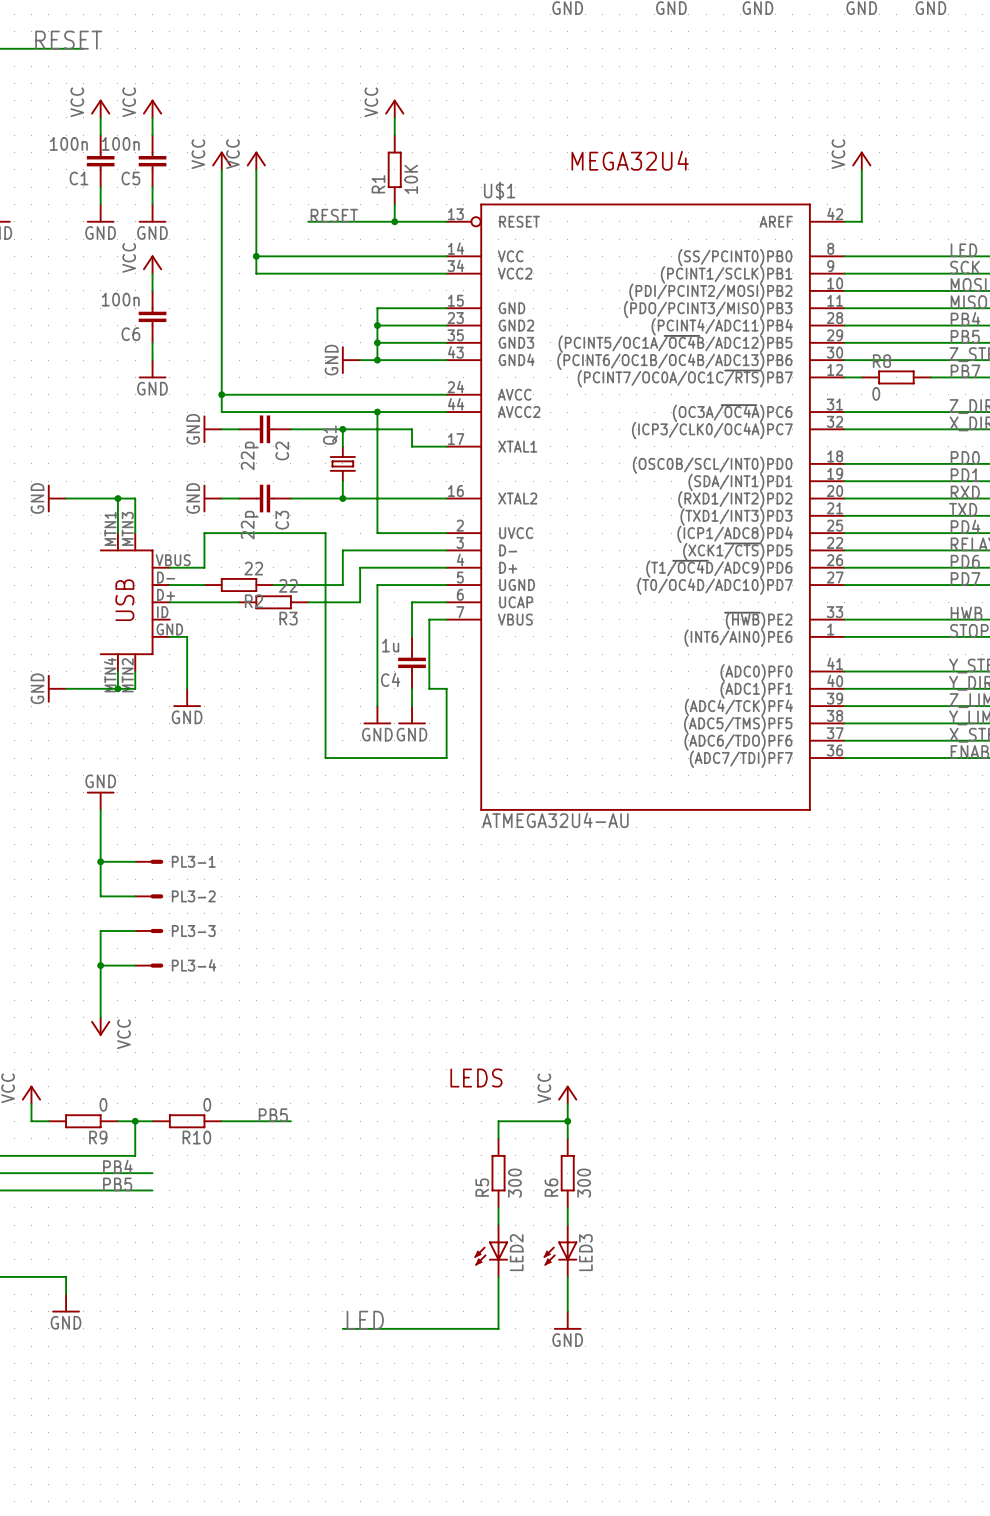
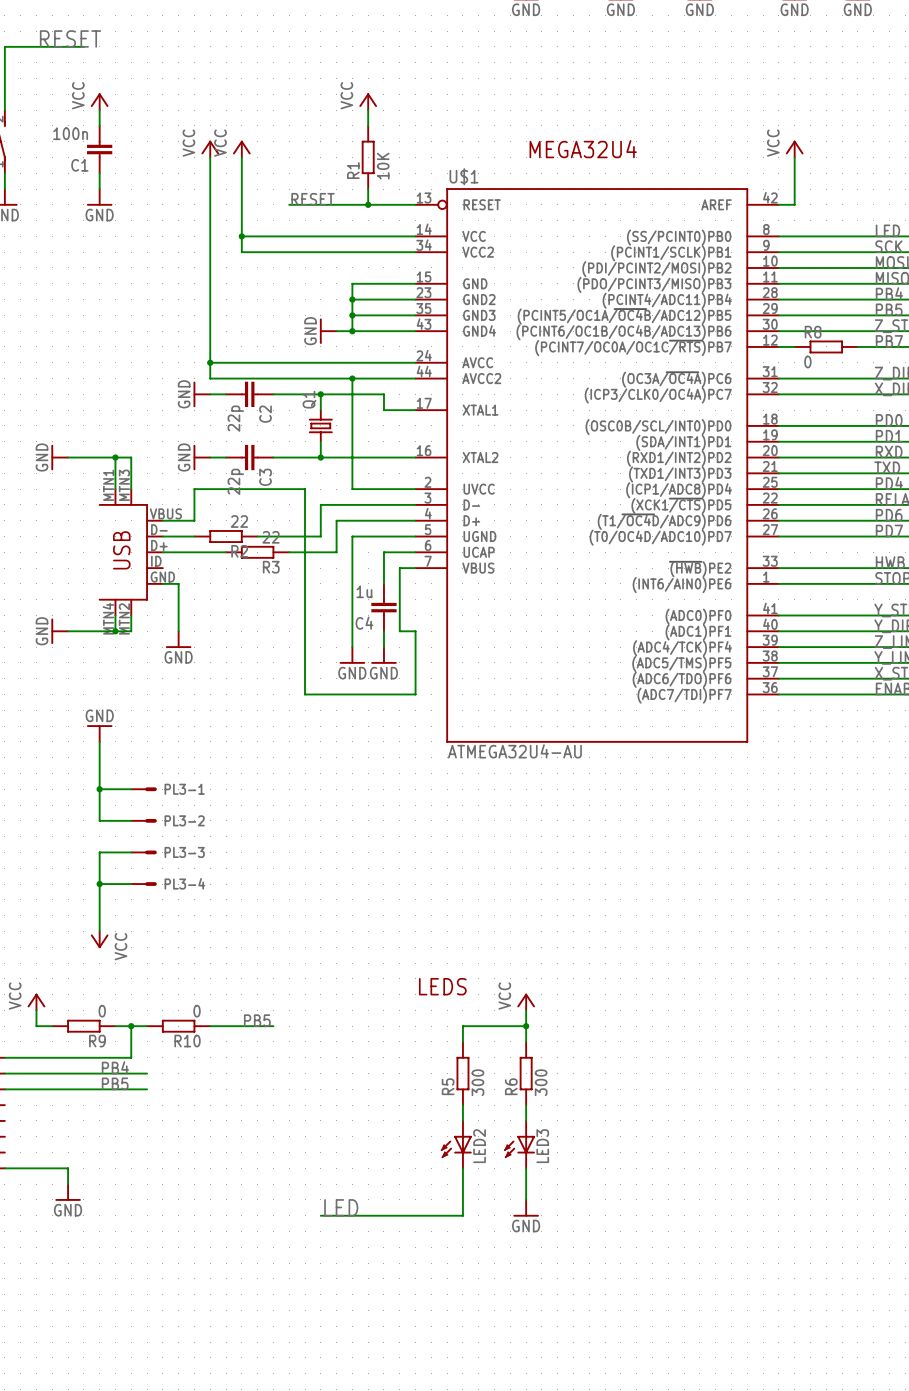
power symbol: VCC (152, 108) -> none
wire: (152, 117) (152, 135) -> none
C5: 100n (152, 161) -> none
wire: (152, 187) (152, 204) -> none
power symbol: GND (152, 213) -> none
power symbol: VCC (152, 264) -> none
wire: (152, 273) (152, 290) -> none
C6: 100n (152, 316) -> none
wire: (152, 342) (152, 360) -> none
power symbol: GND (152, 369) -> none

